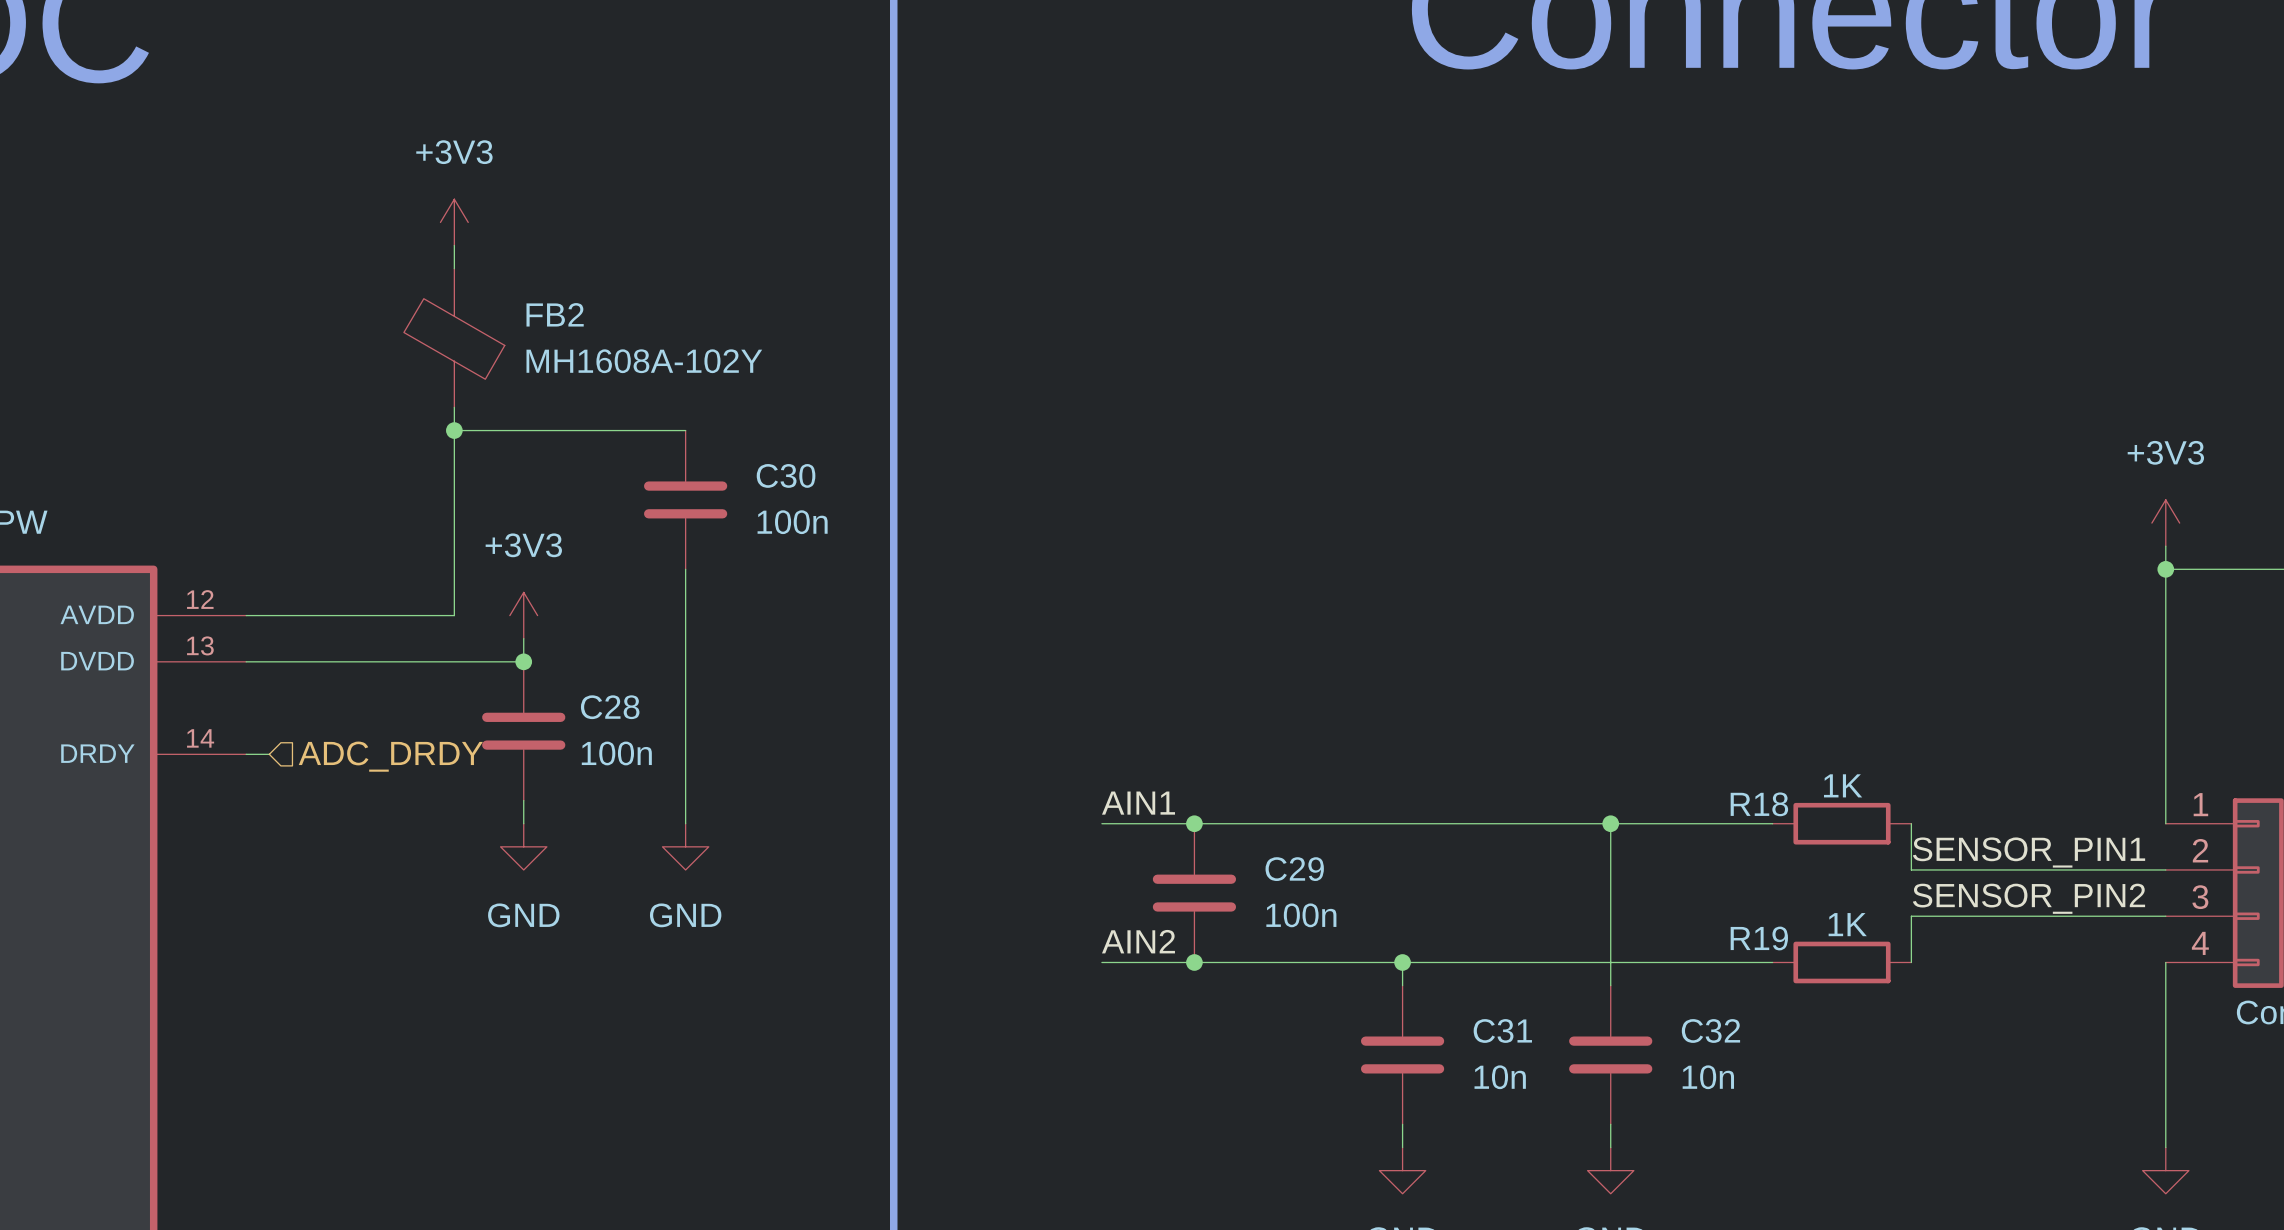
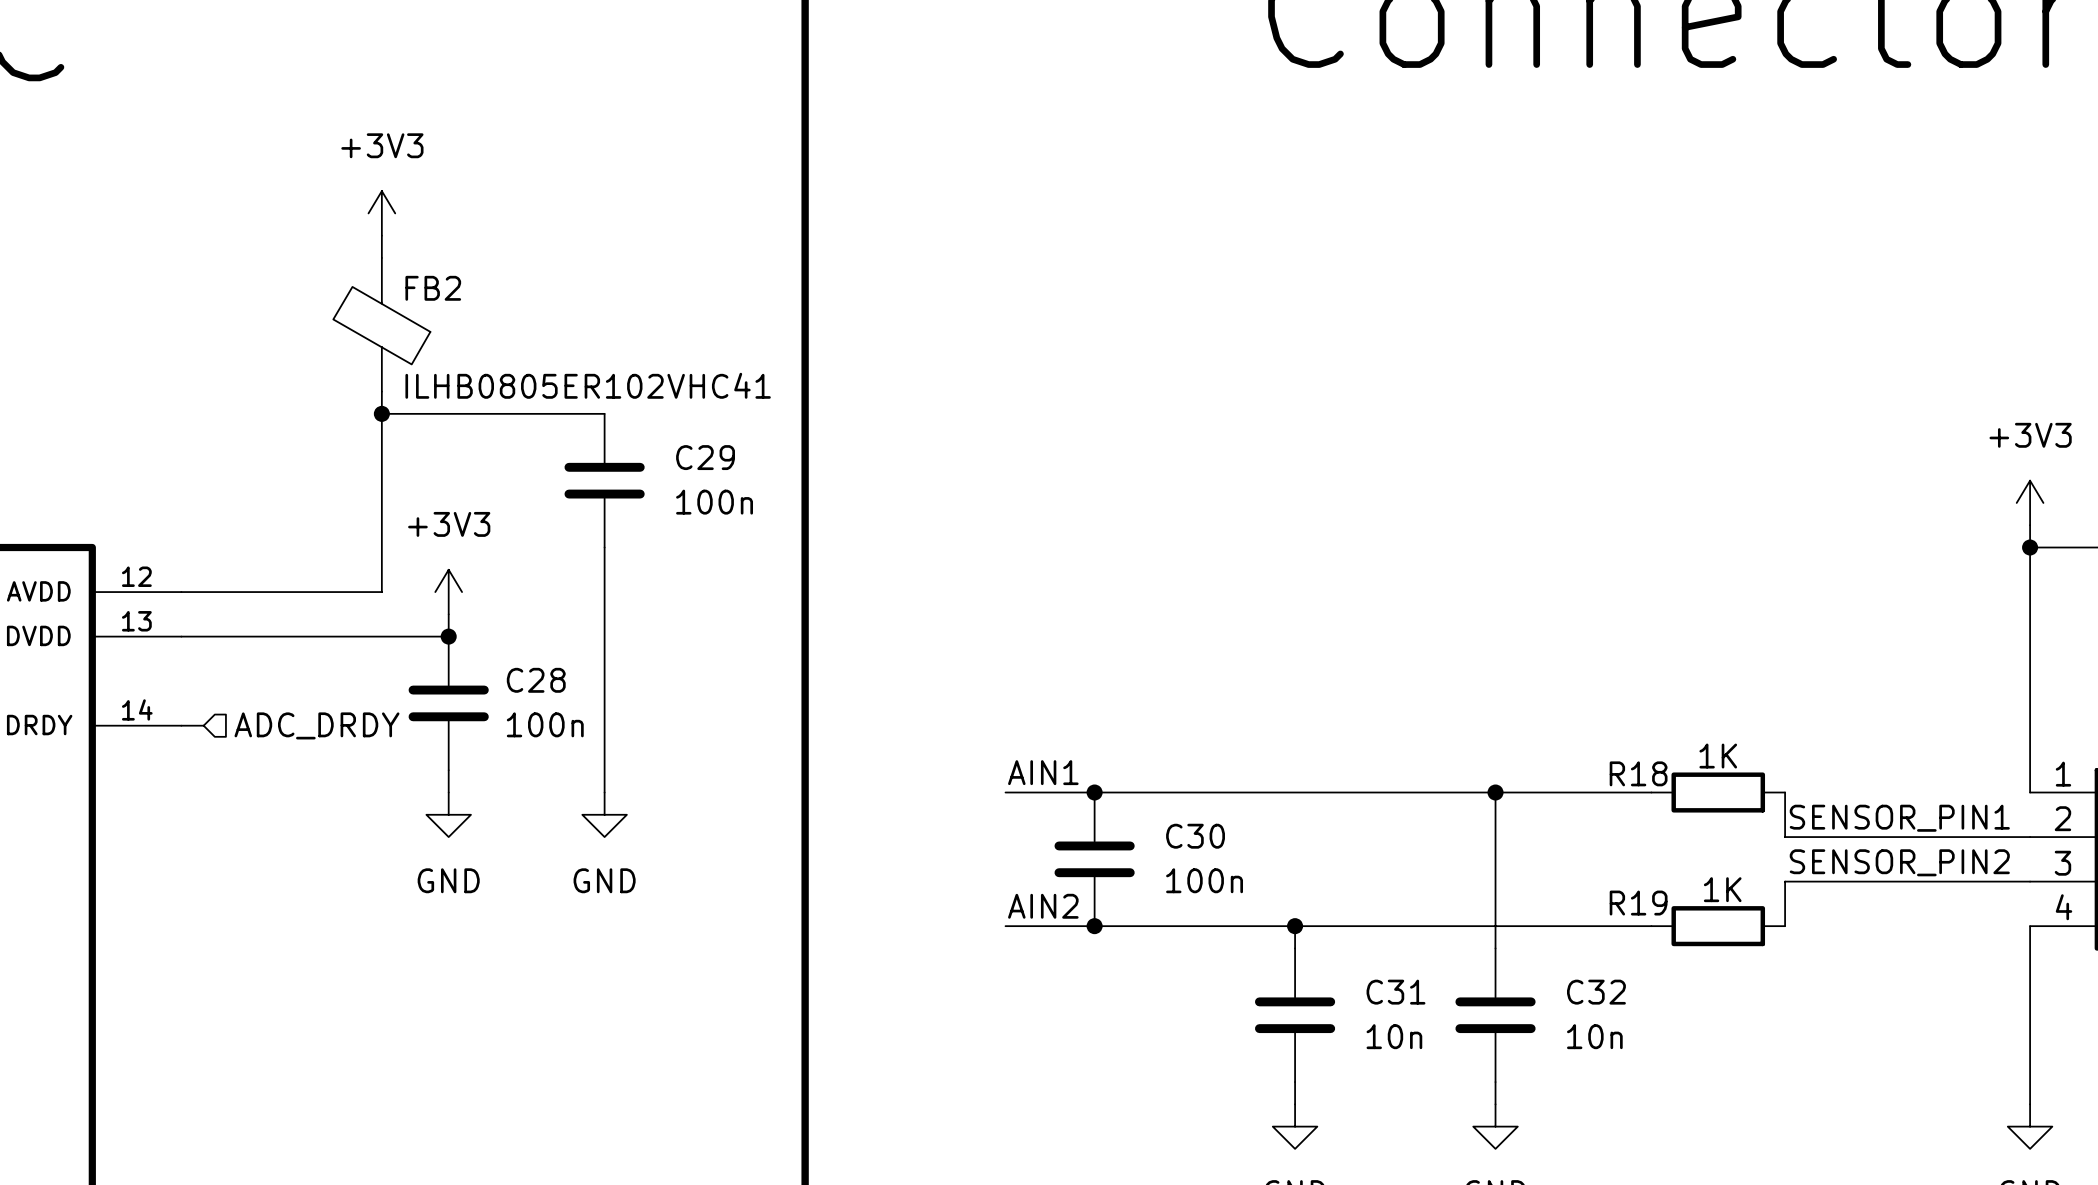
FB2 name position: FB2 (555, 314) -> FB2 (433, 288)
FB2 value: MH1608A-102Y (644, 361) -> ILHB0805ER102VHC41 (588, 385)
C30 name: C30 (786, 475) -> C29 (705, 457)
C29 name: C29 (1294, 869) -> C30 (1195, 836)

